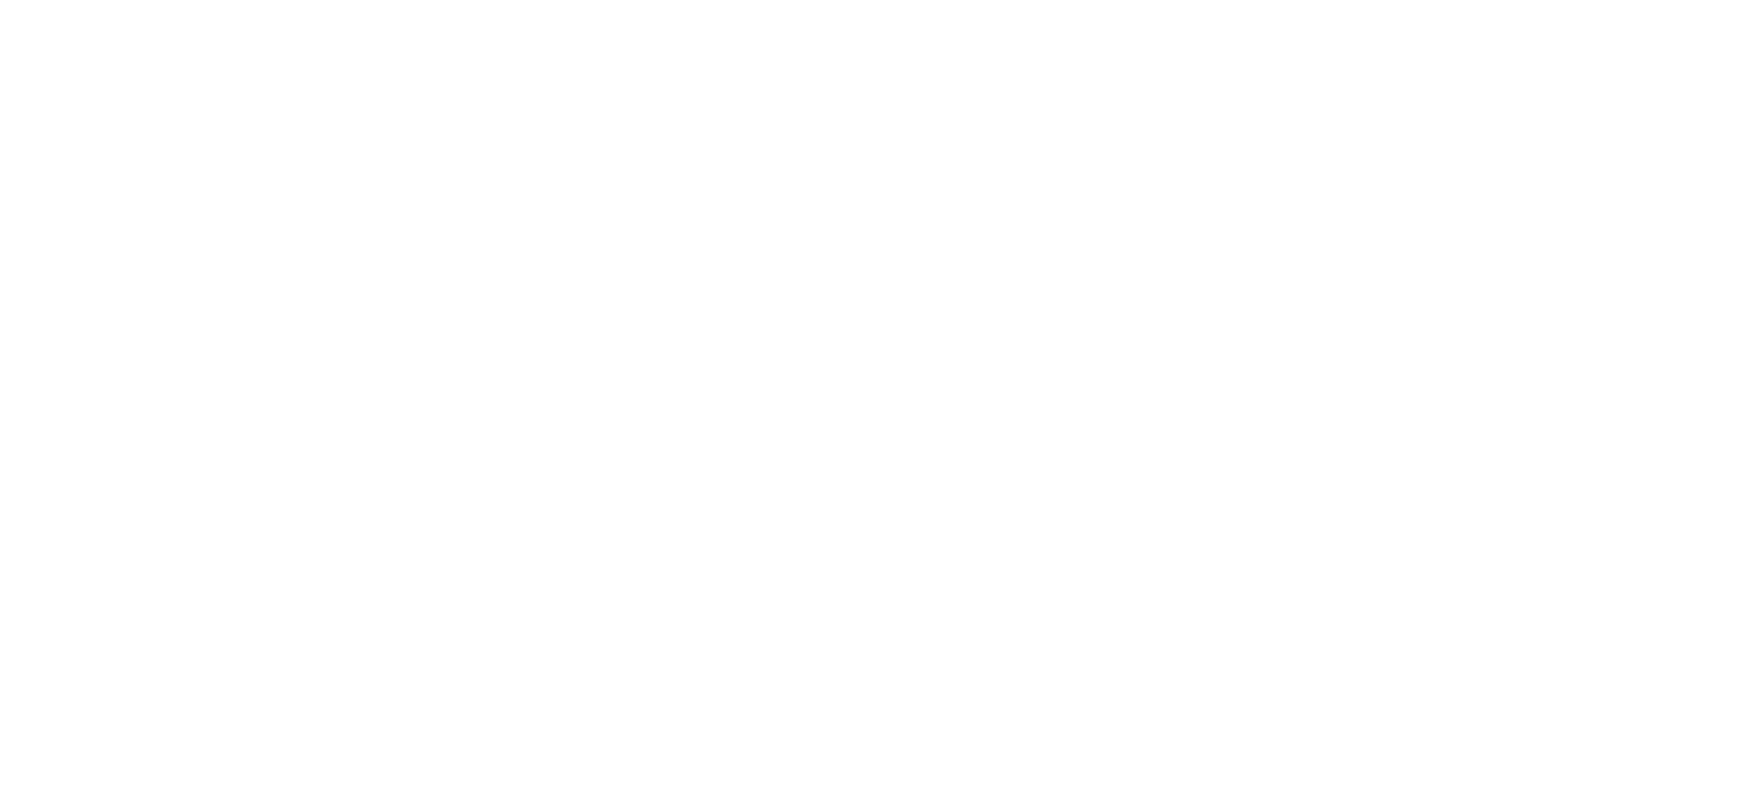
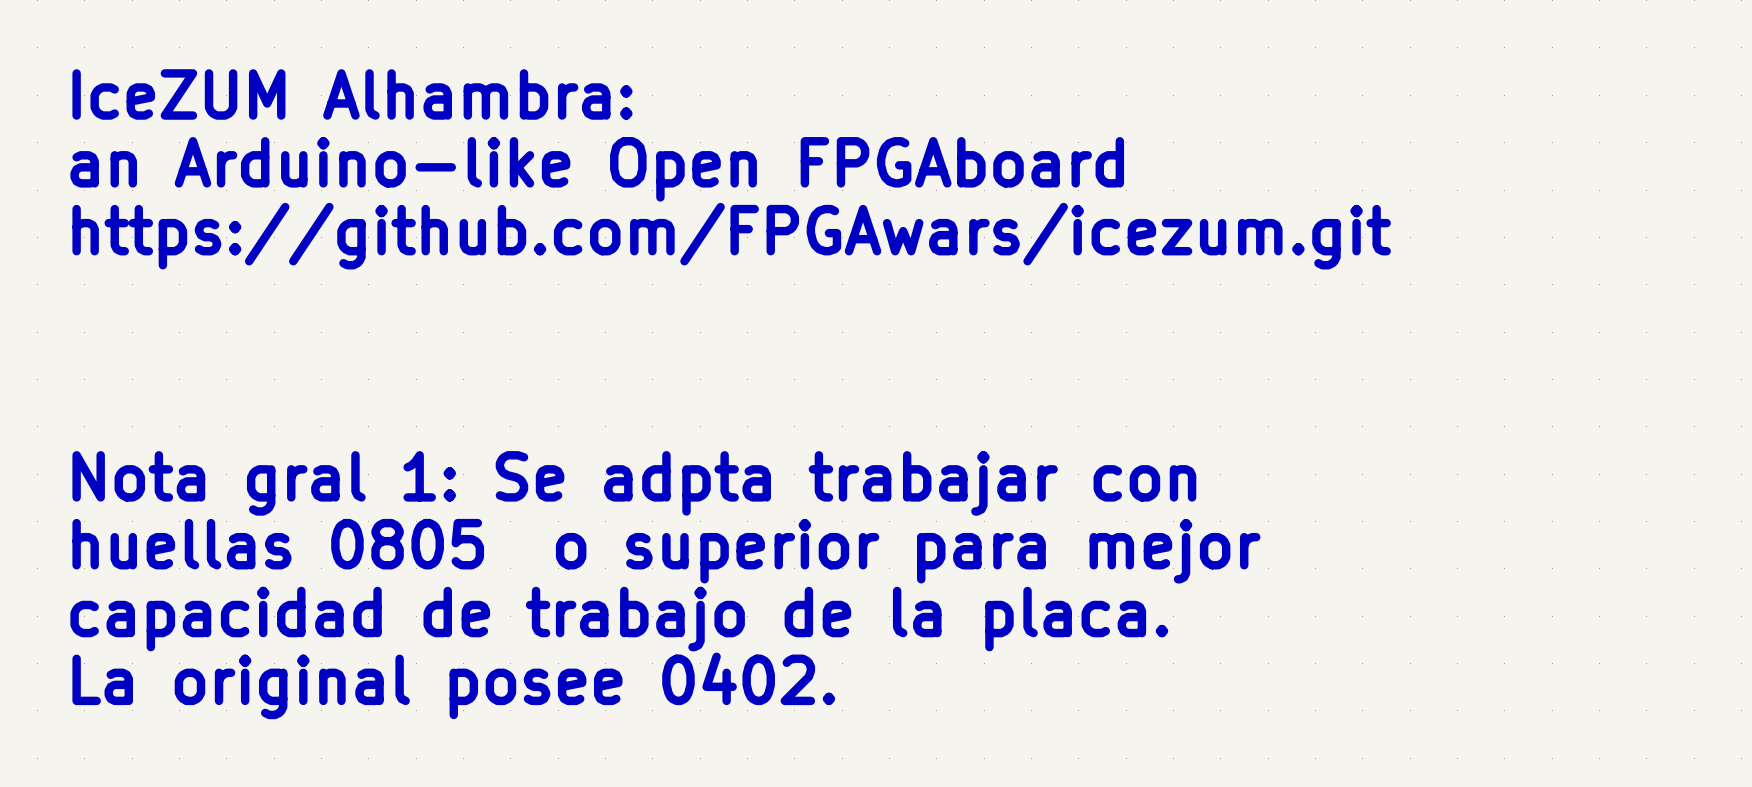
text: none -> IceZUM Alhambra: (352, 94)
text: none -> an Arduino-like Open FPGAboard (597, 169)
text: none -> https://github.com/FPGAwars/icezum.git (731, 236)
text: none -> Nota gral 1: Se adpta trabajar con (634, 483)
text: none -> huellas 0805 o superior para mejor (666, 551)
text: none -> capacidad de trabajo de la placa. (619, 619)
text: none -> La original posee 0402. (453, 685)

